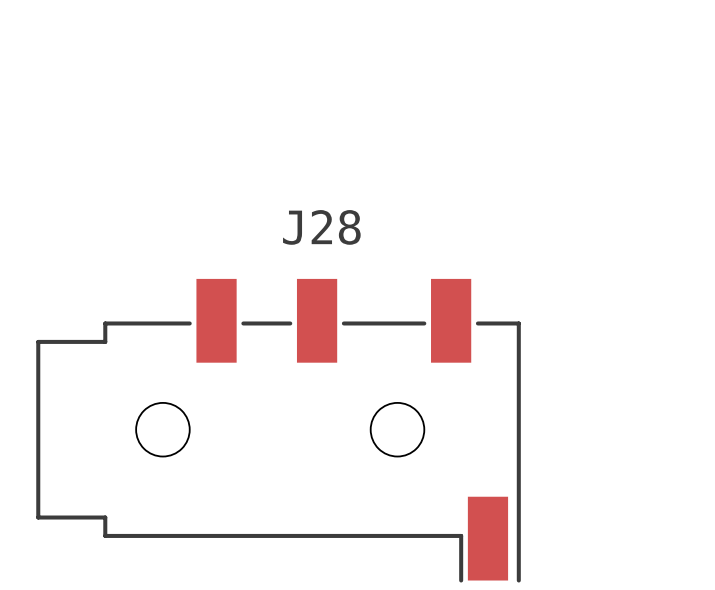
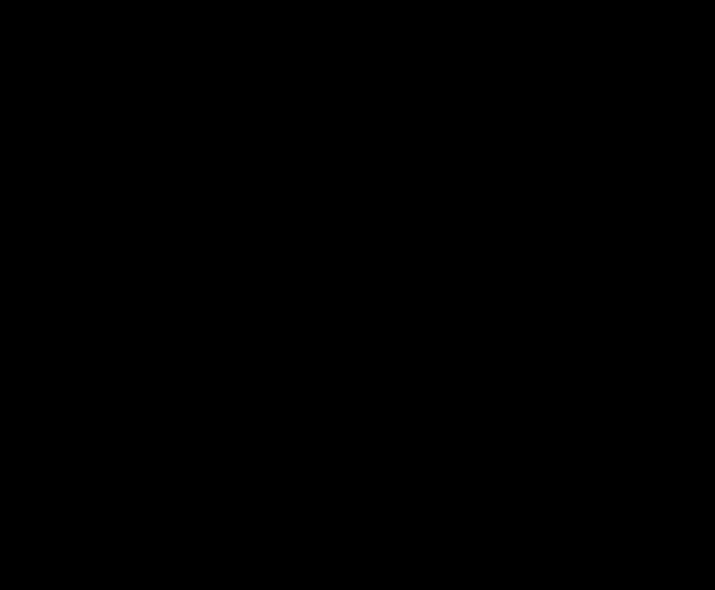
J28: (278, 430) -> none

